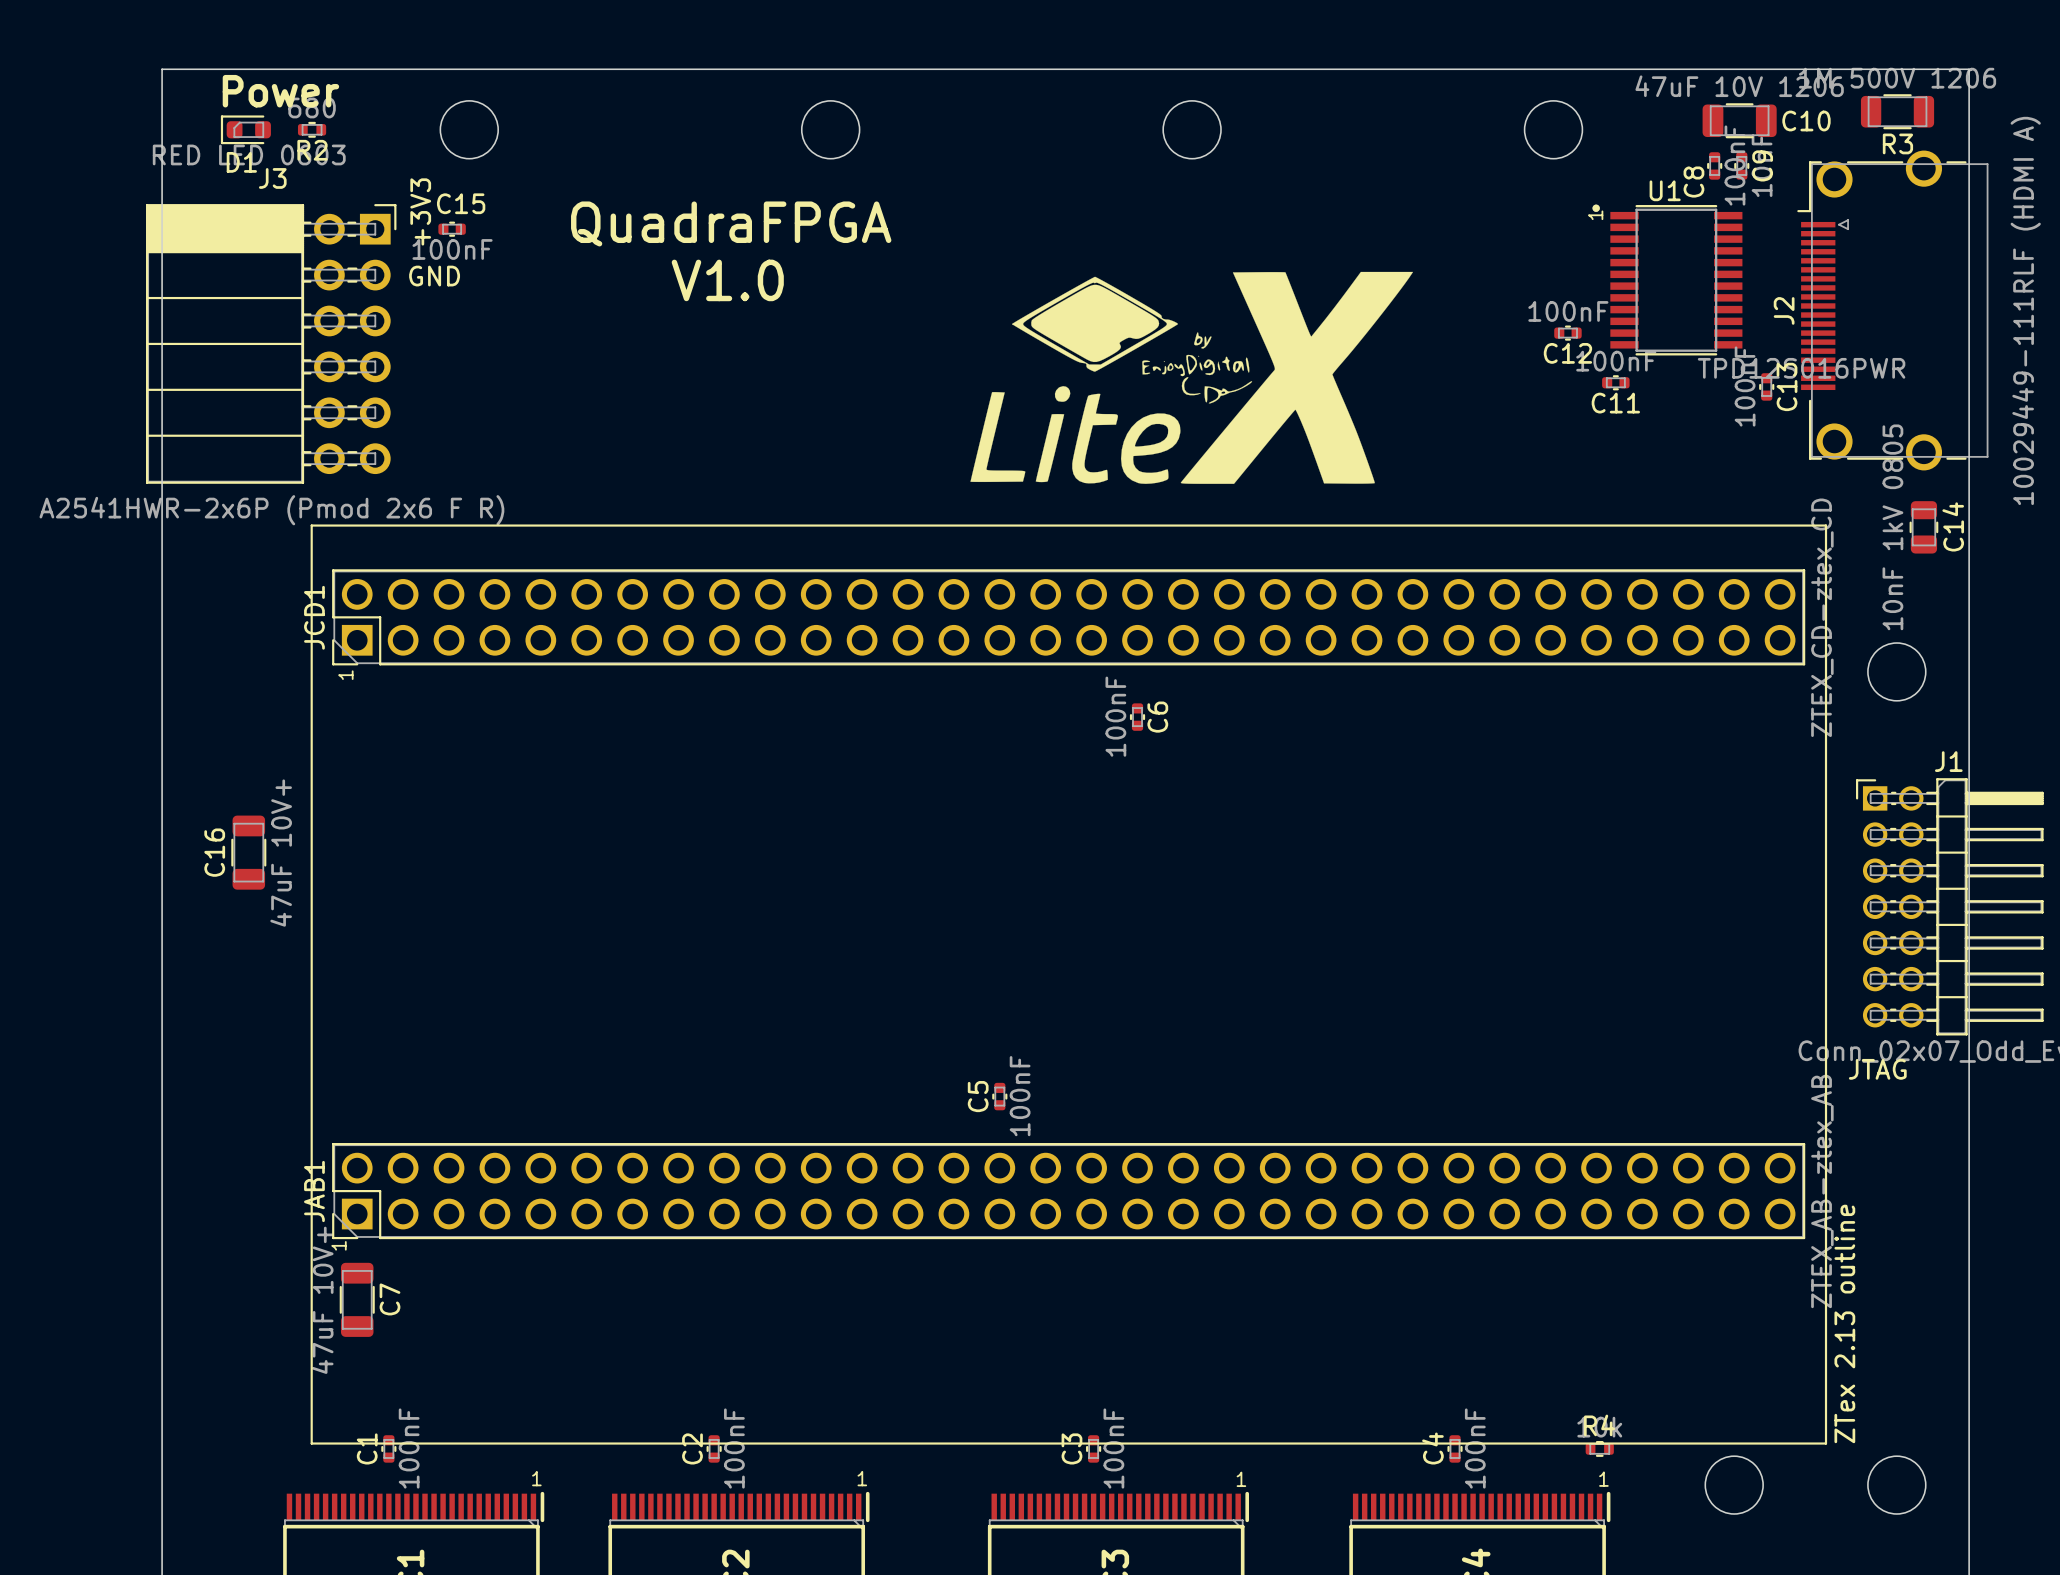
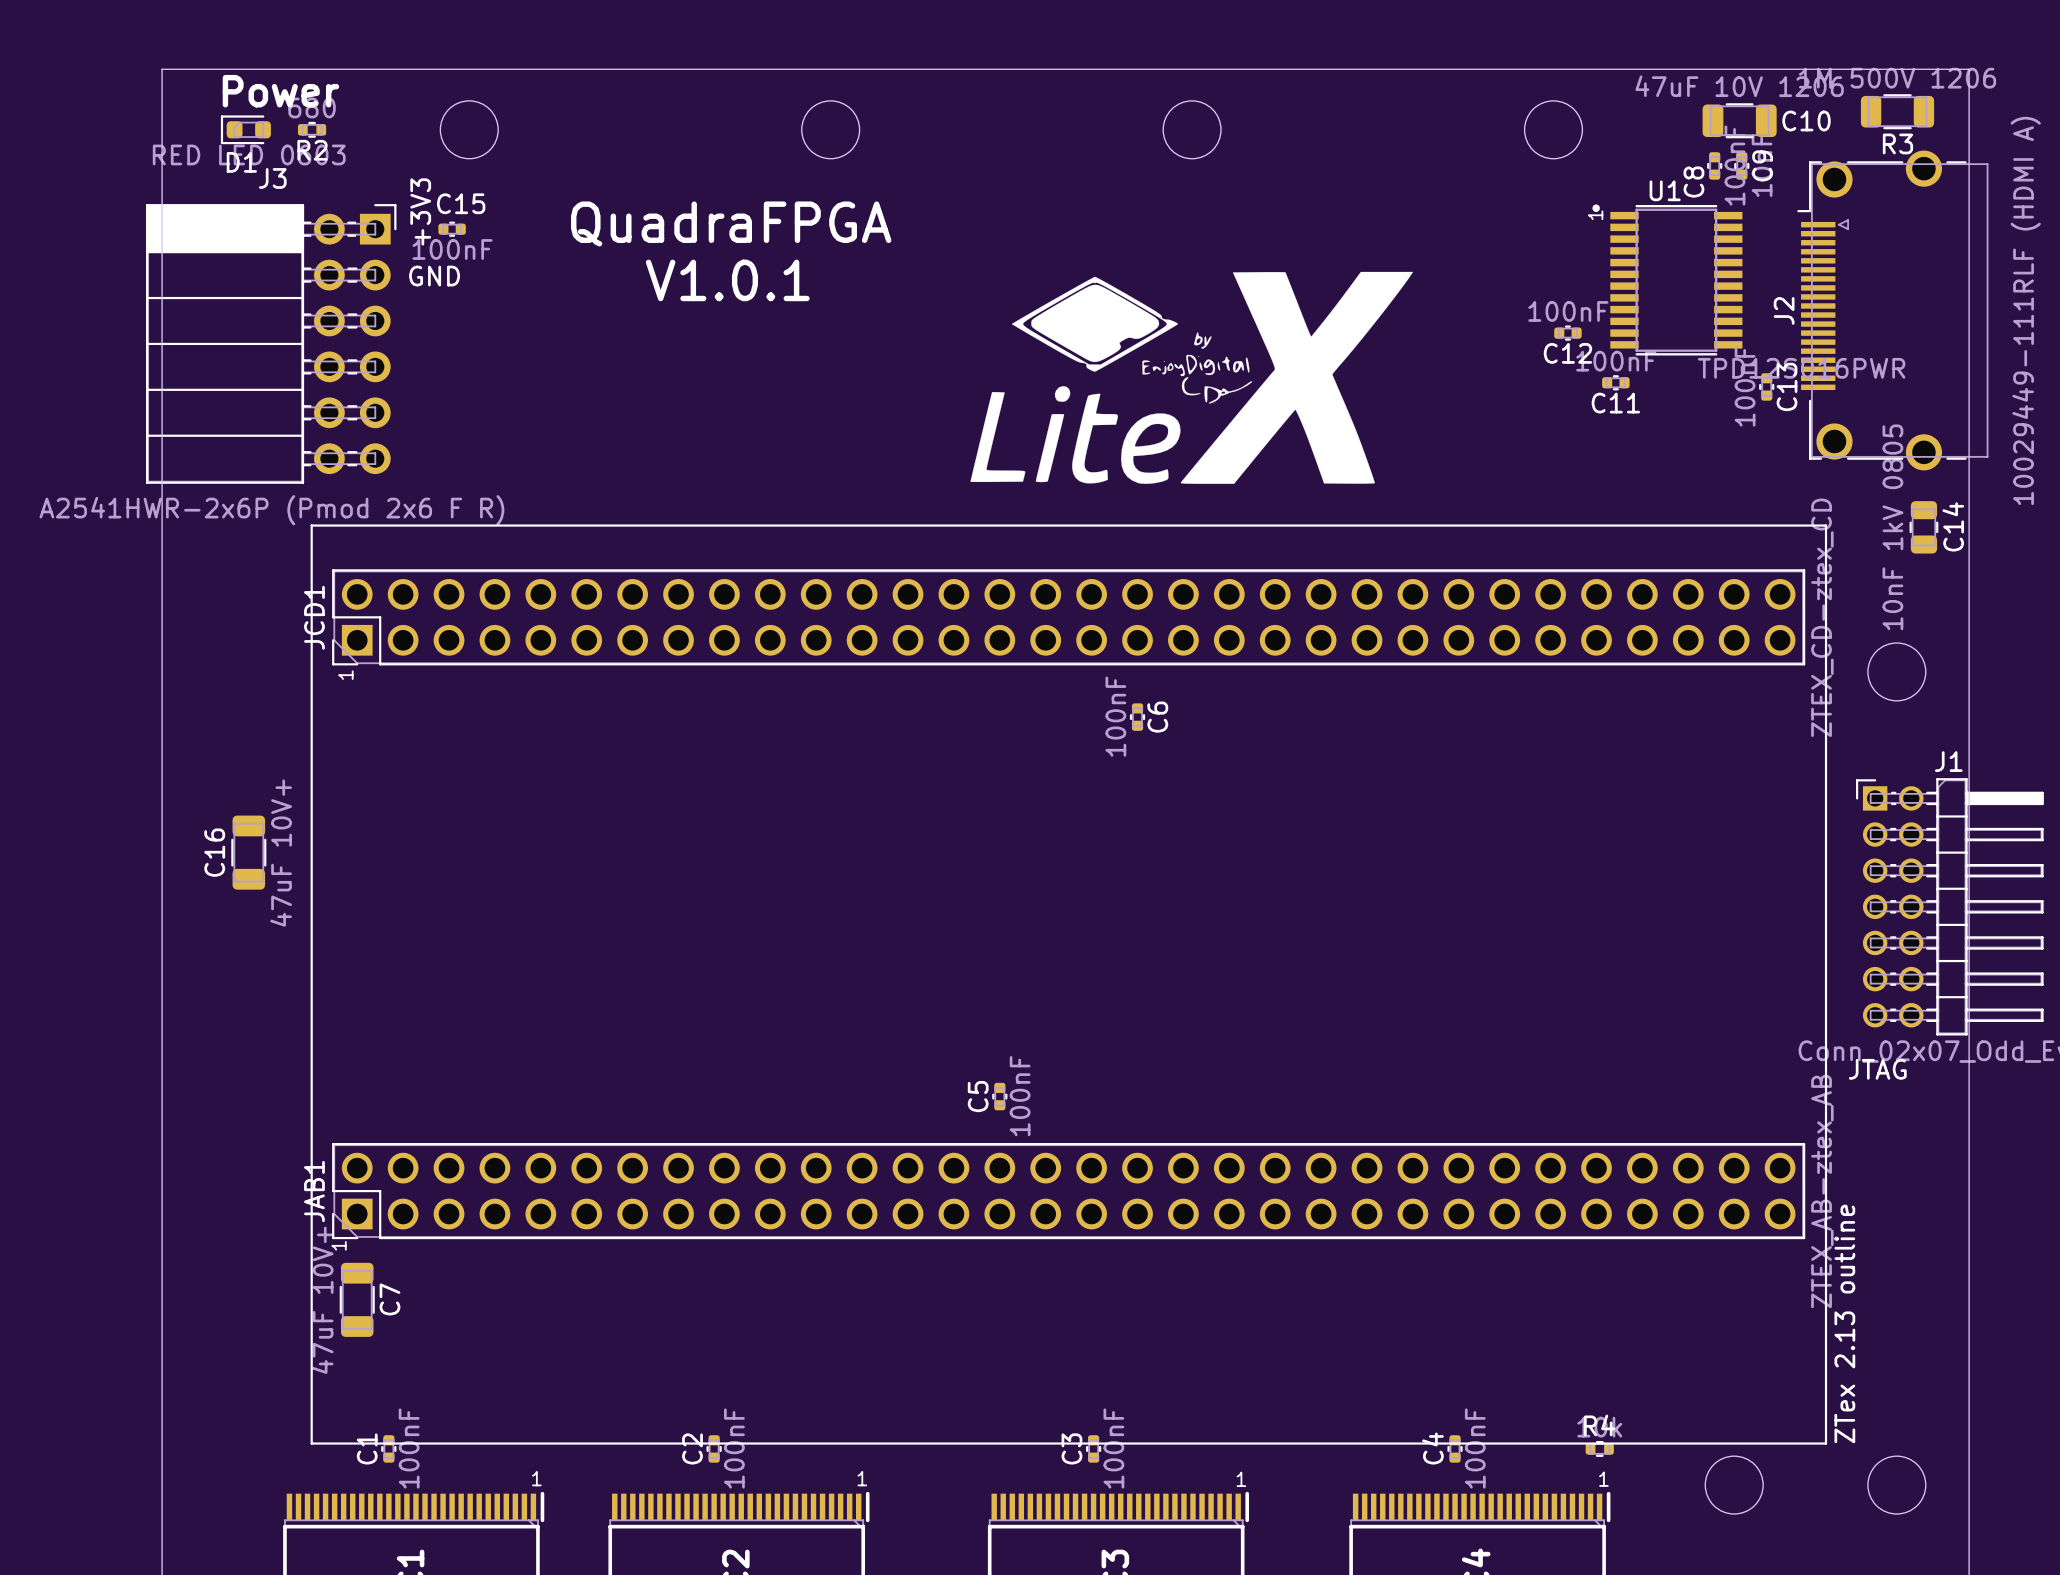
text: V1.0 (727, 280) -> V1.0.1 (727, 280)

